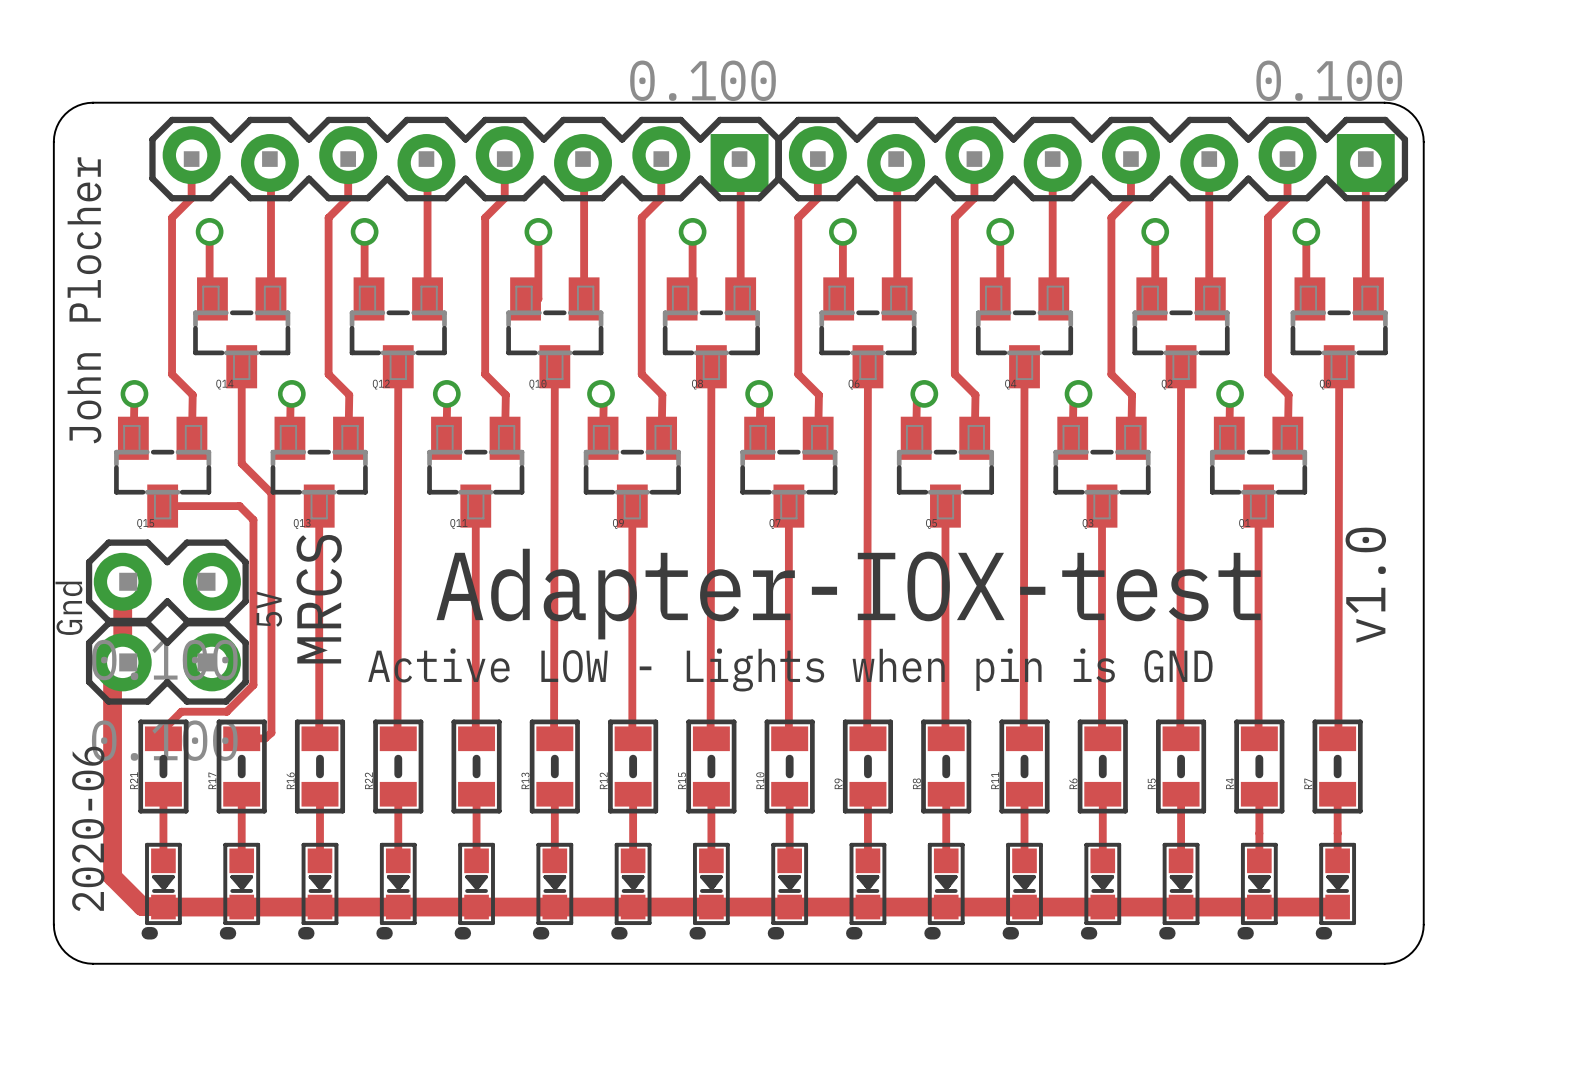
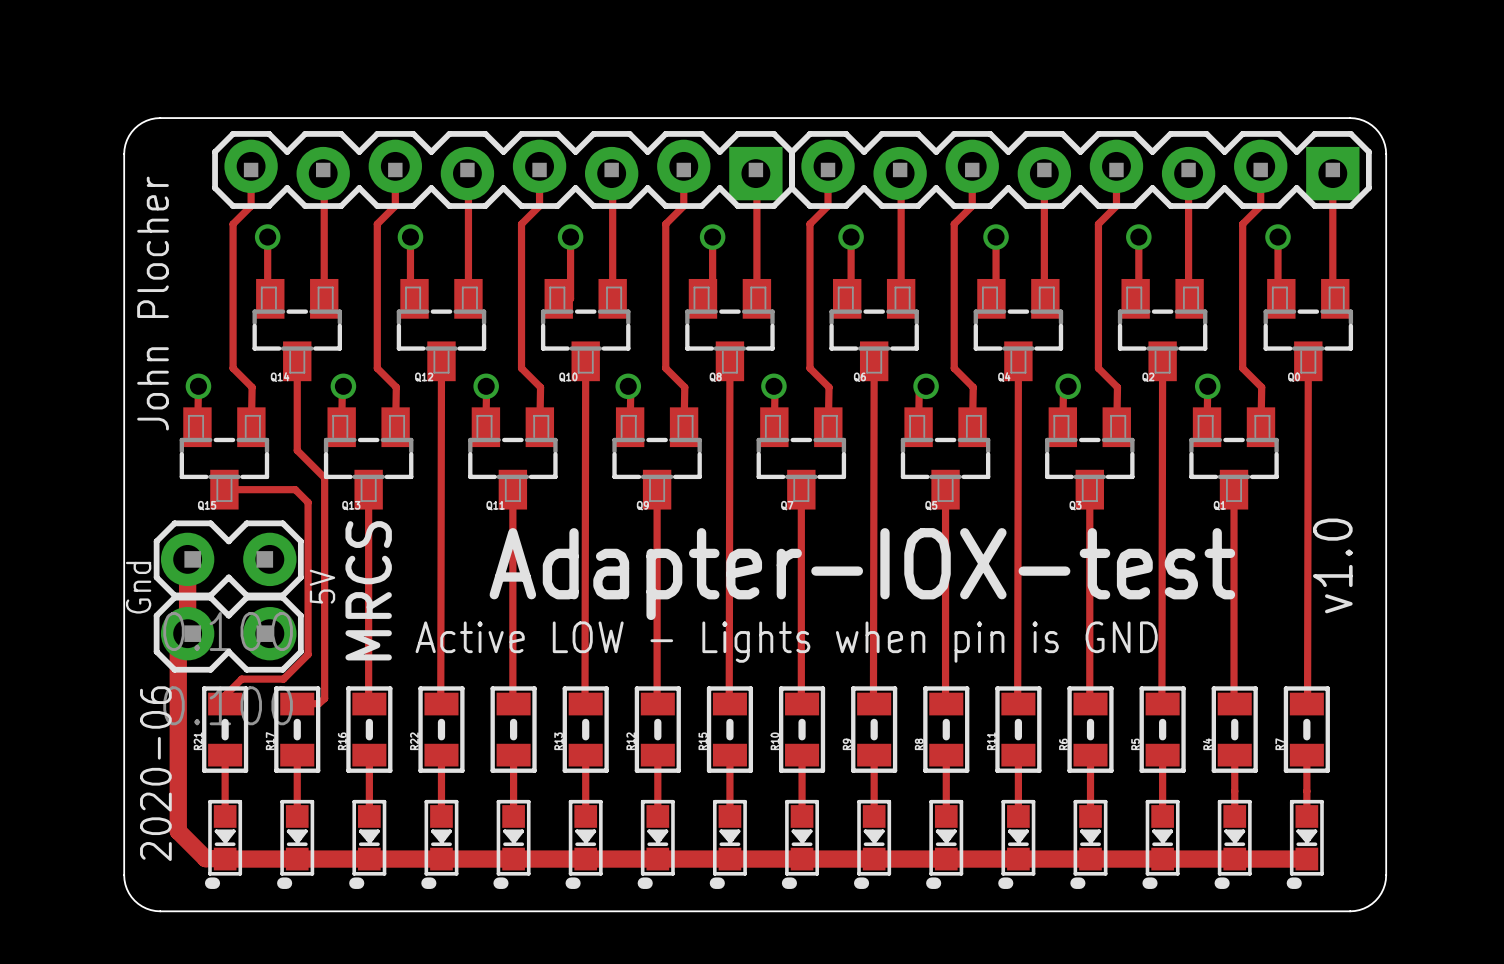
part value: 0.100 (703, 80) -> none
part value: 0.100 (1329, 80) -> none

